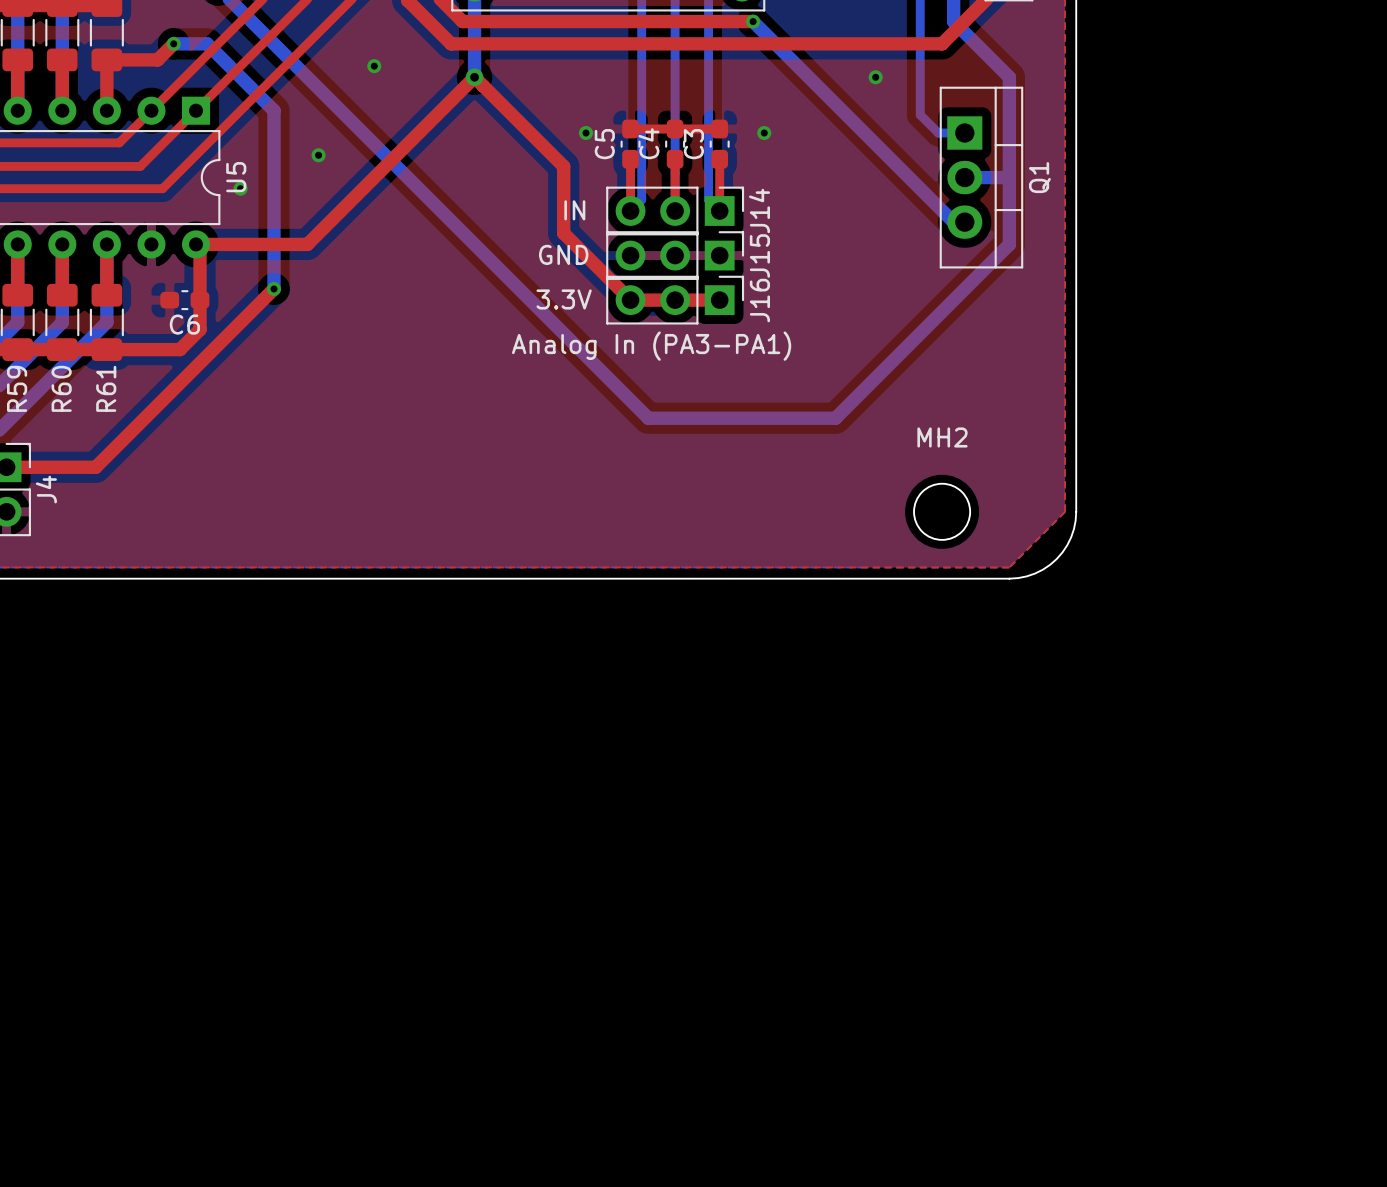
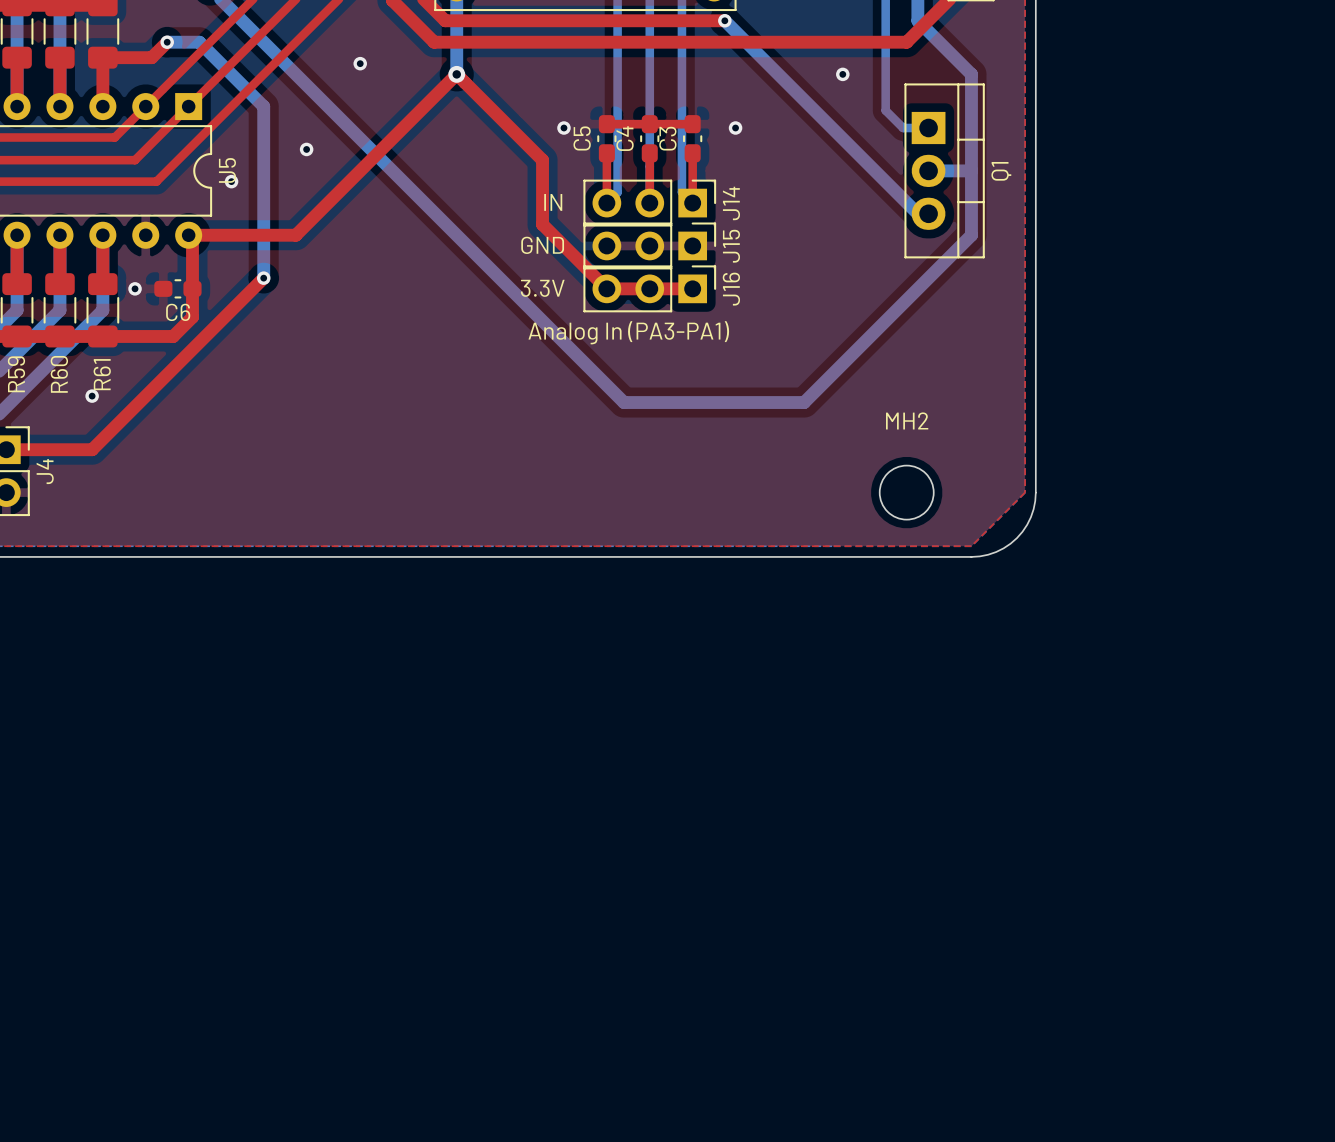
via: none -> (135, 288)
via: none -> (92, 396)

